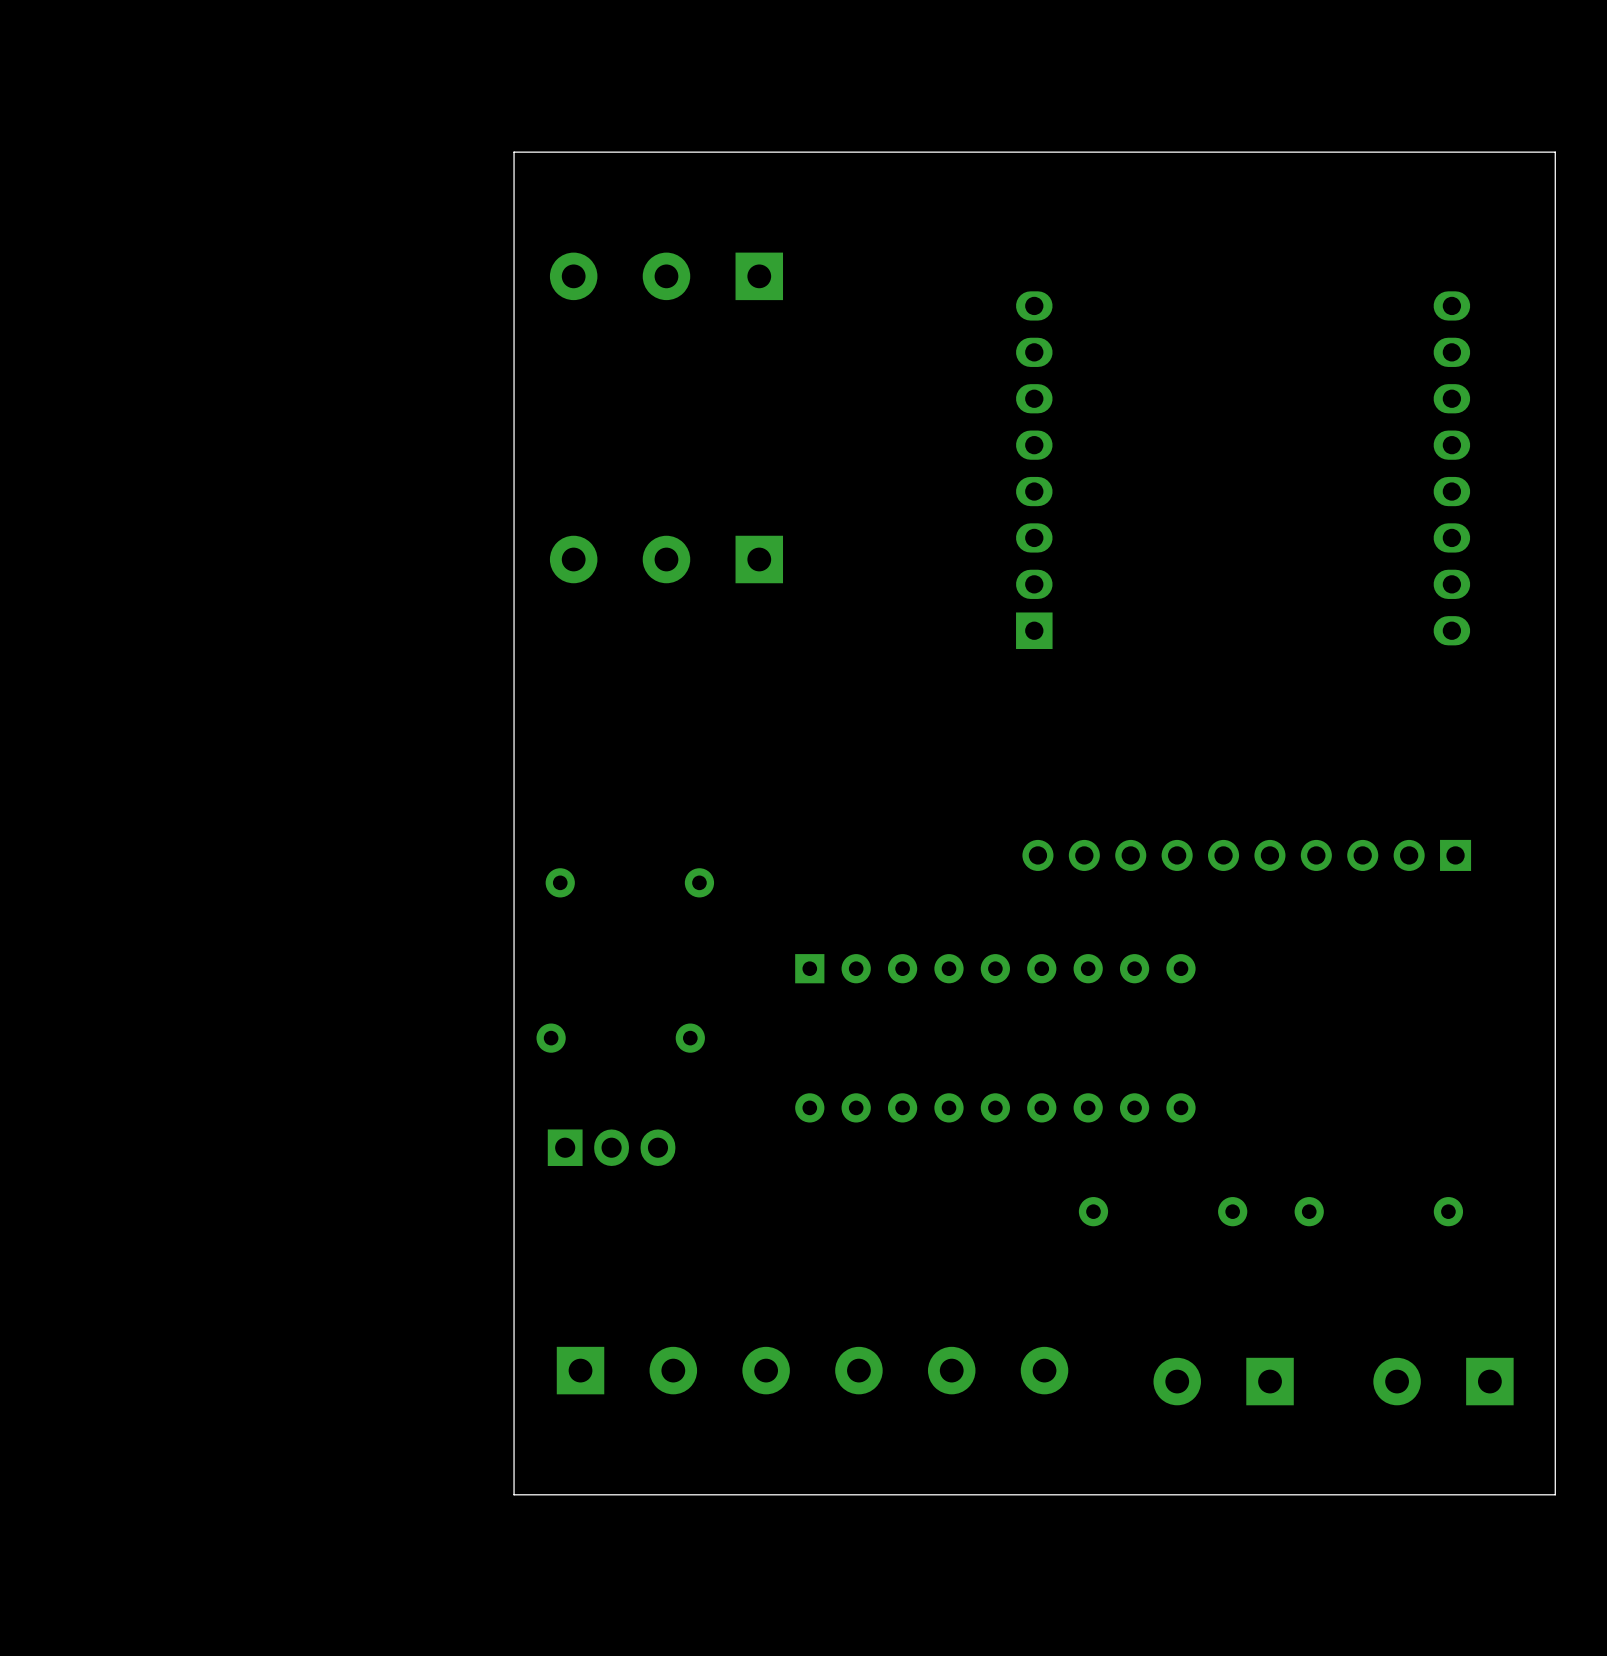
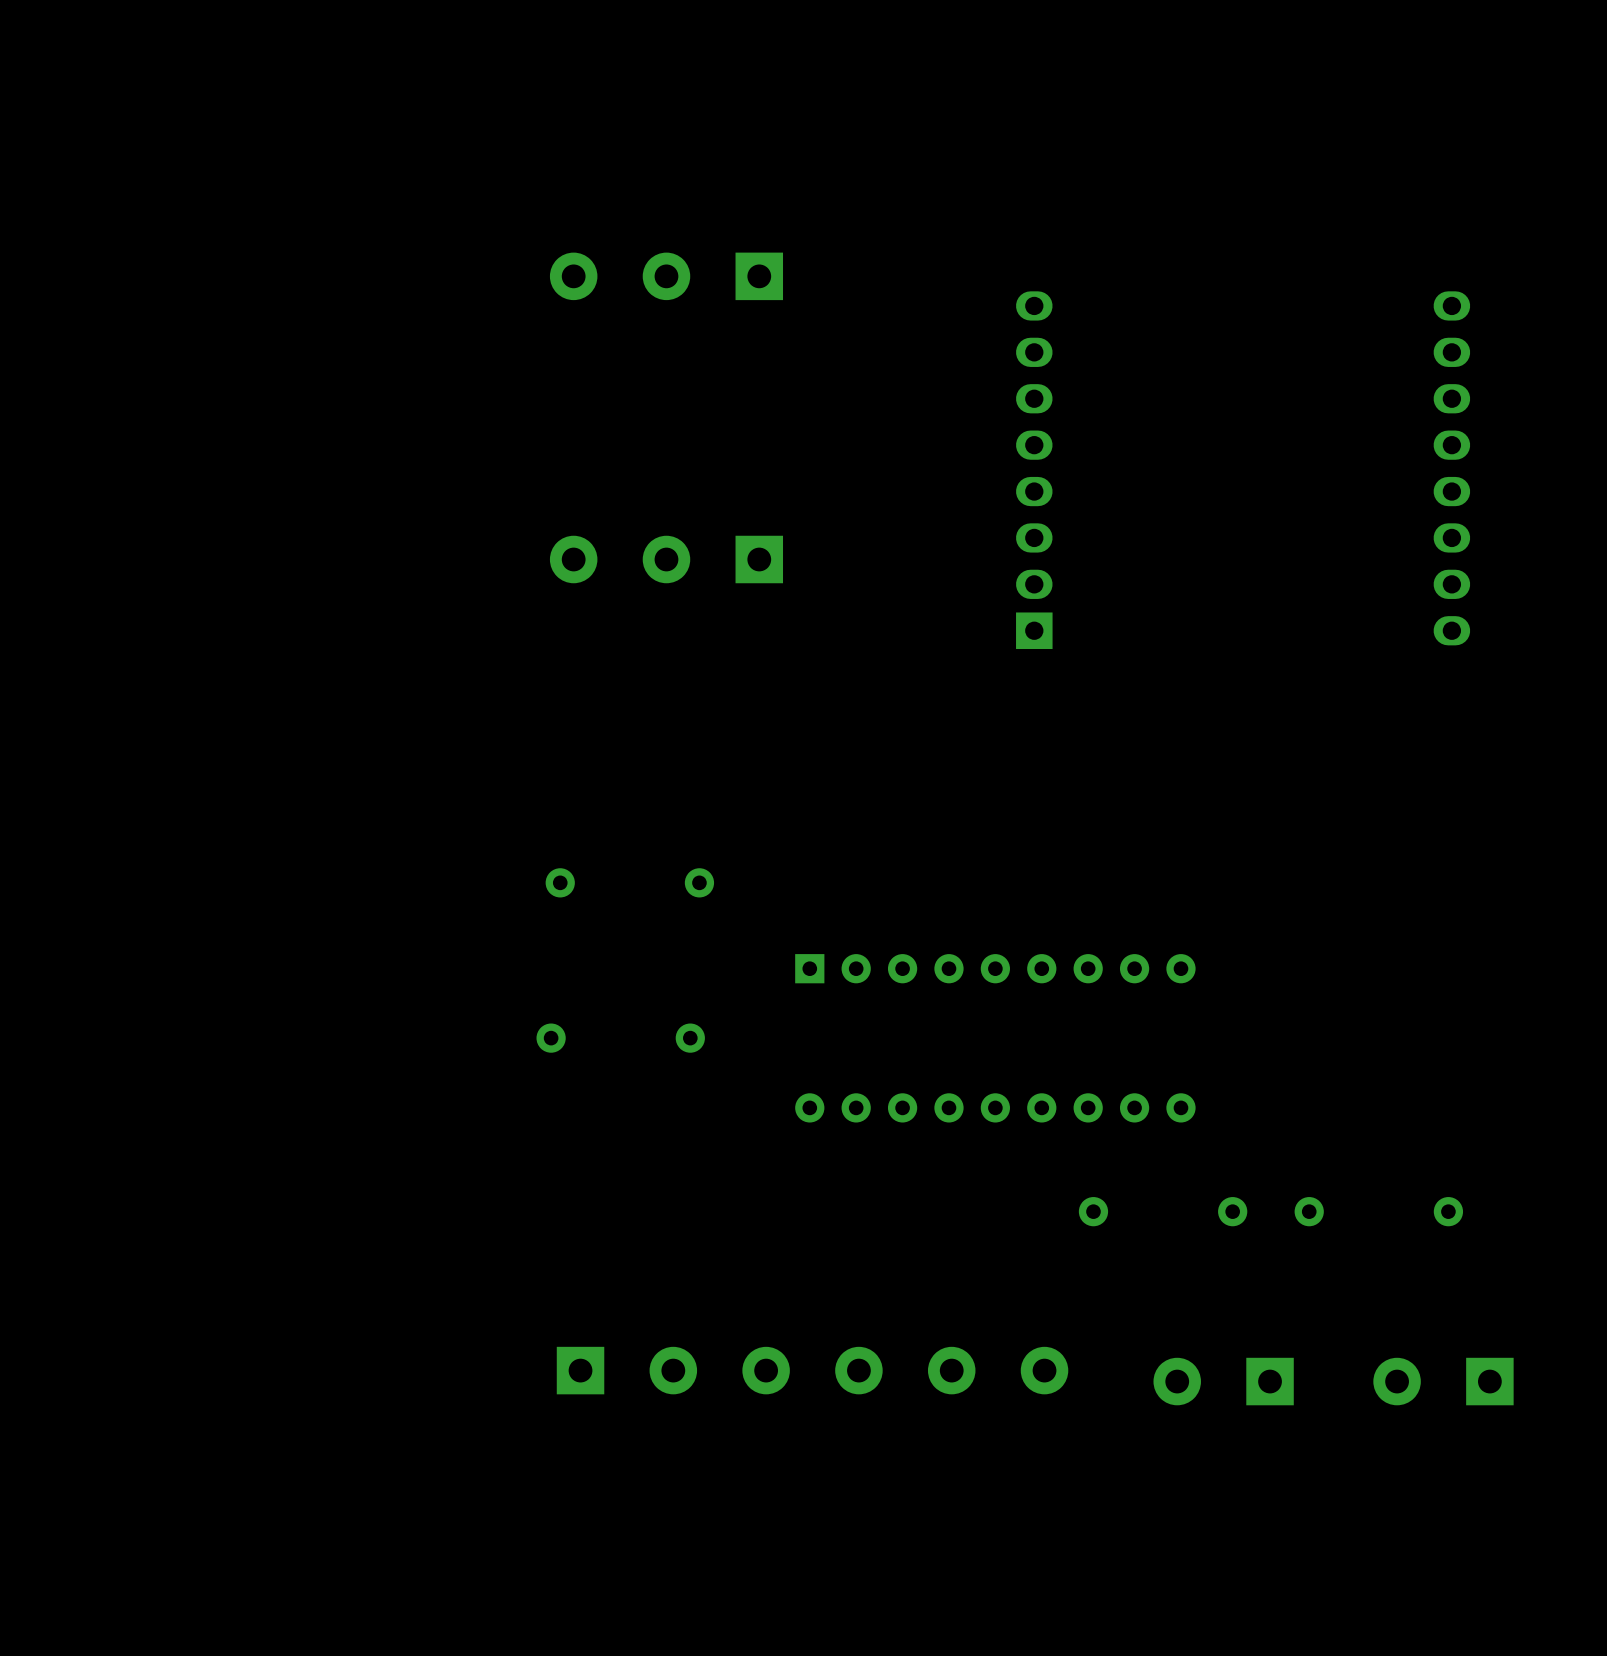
board edge: (1555, 152) (514, 152) (514, 1494) (1555, 1494) (1555, 152) -> none
part: (1246, 855) -> none
part: (611, 1147) -> none

